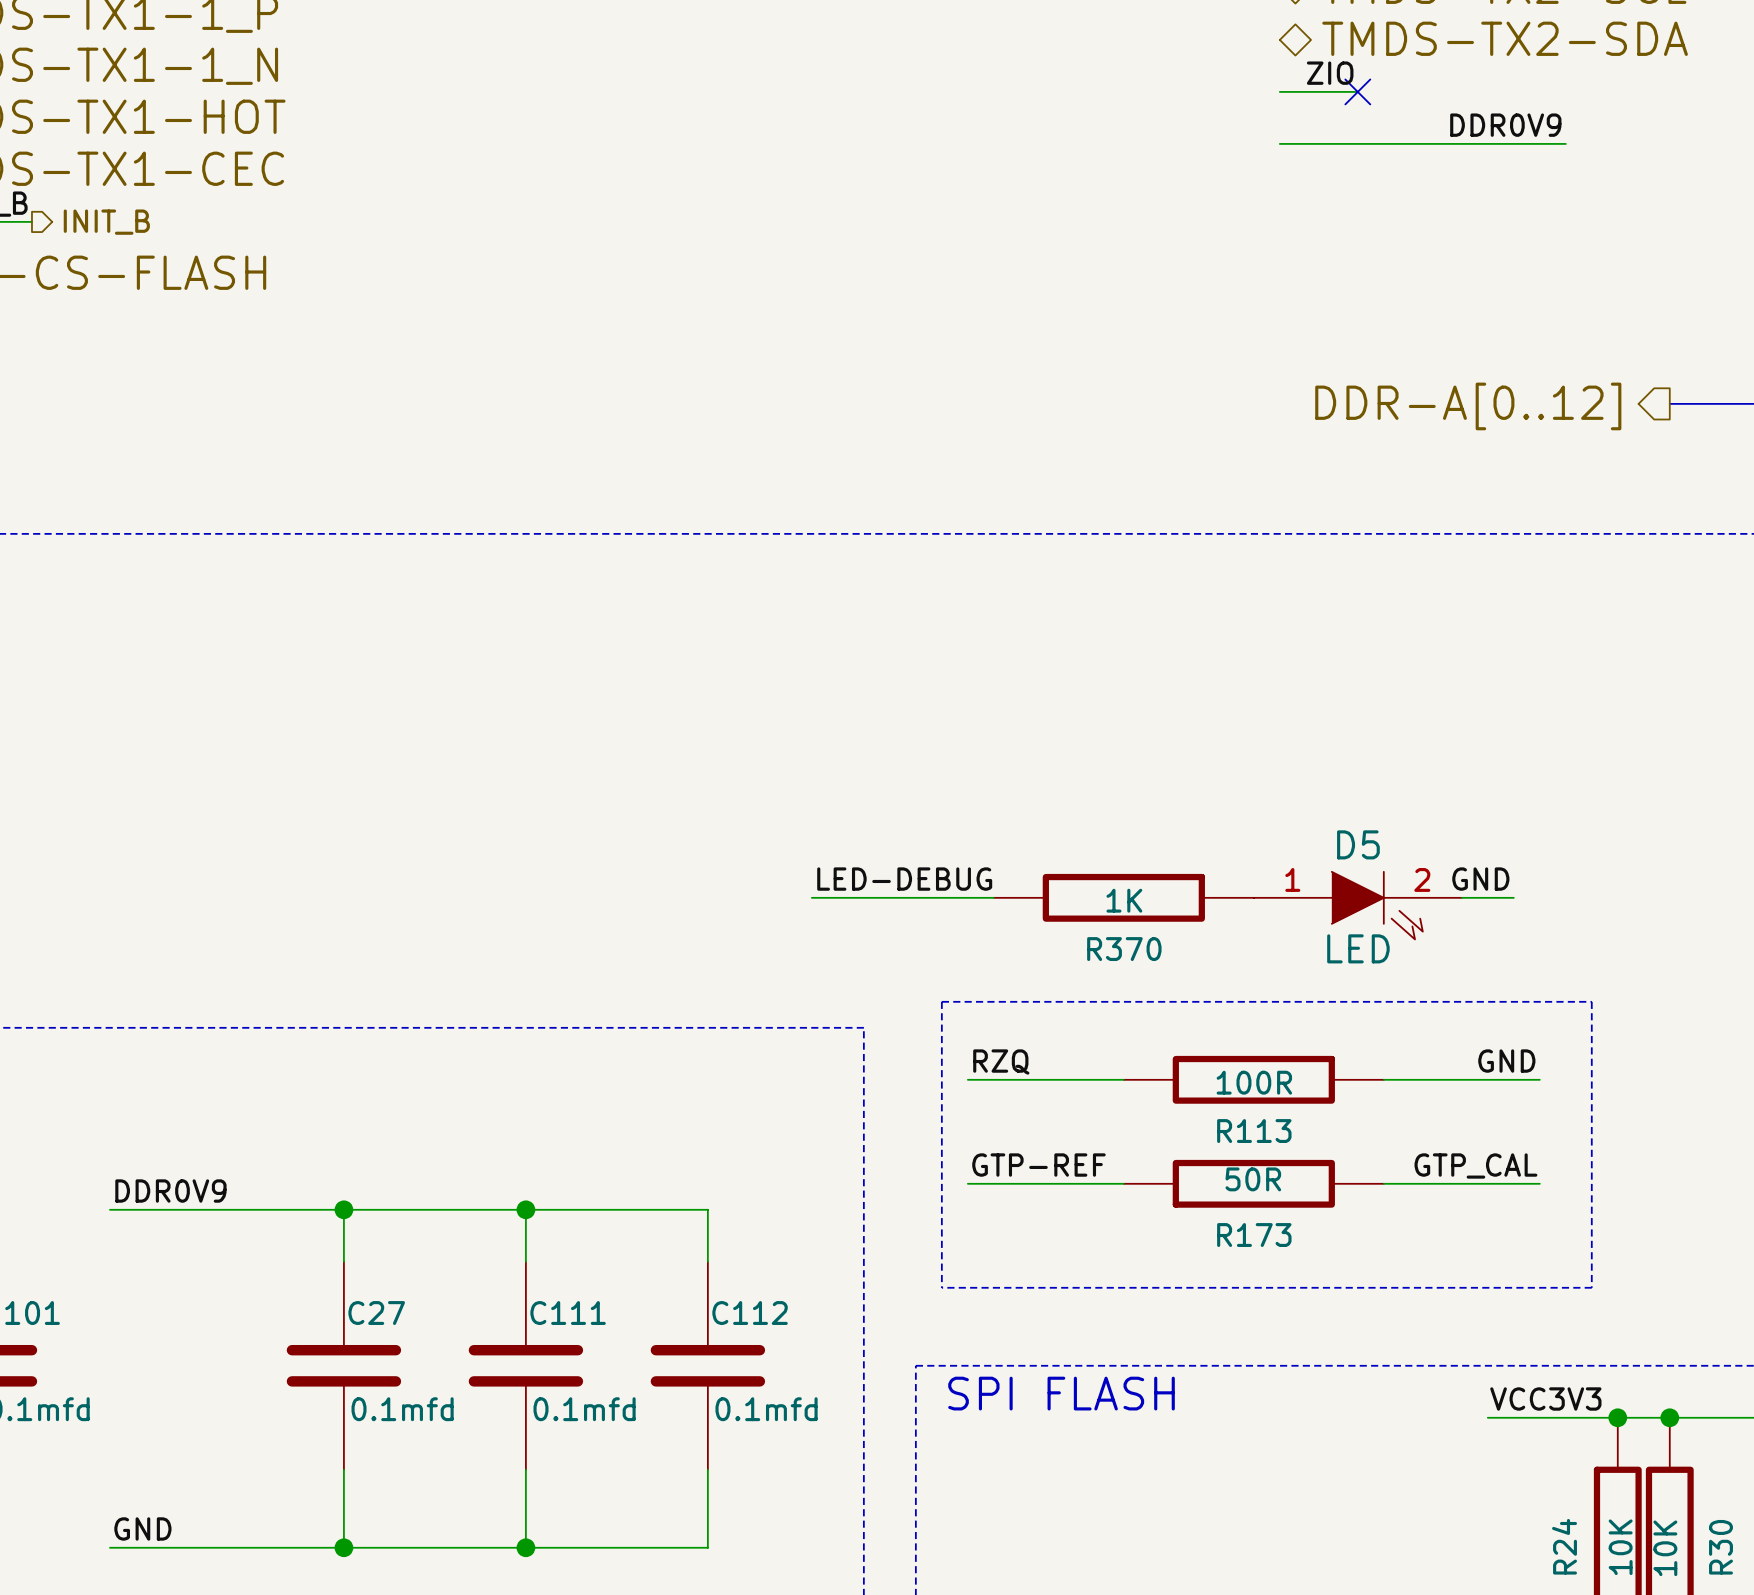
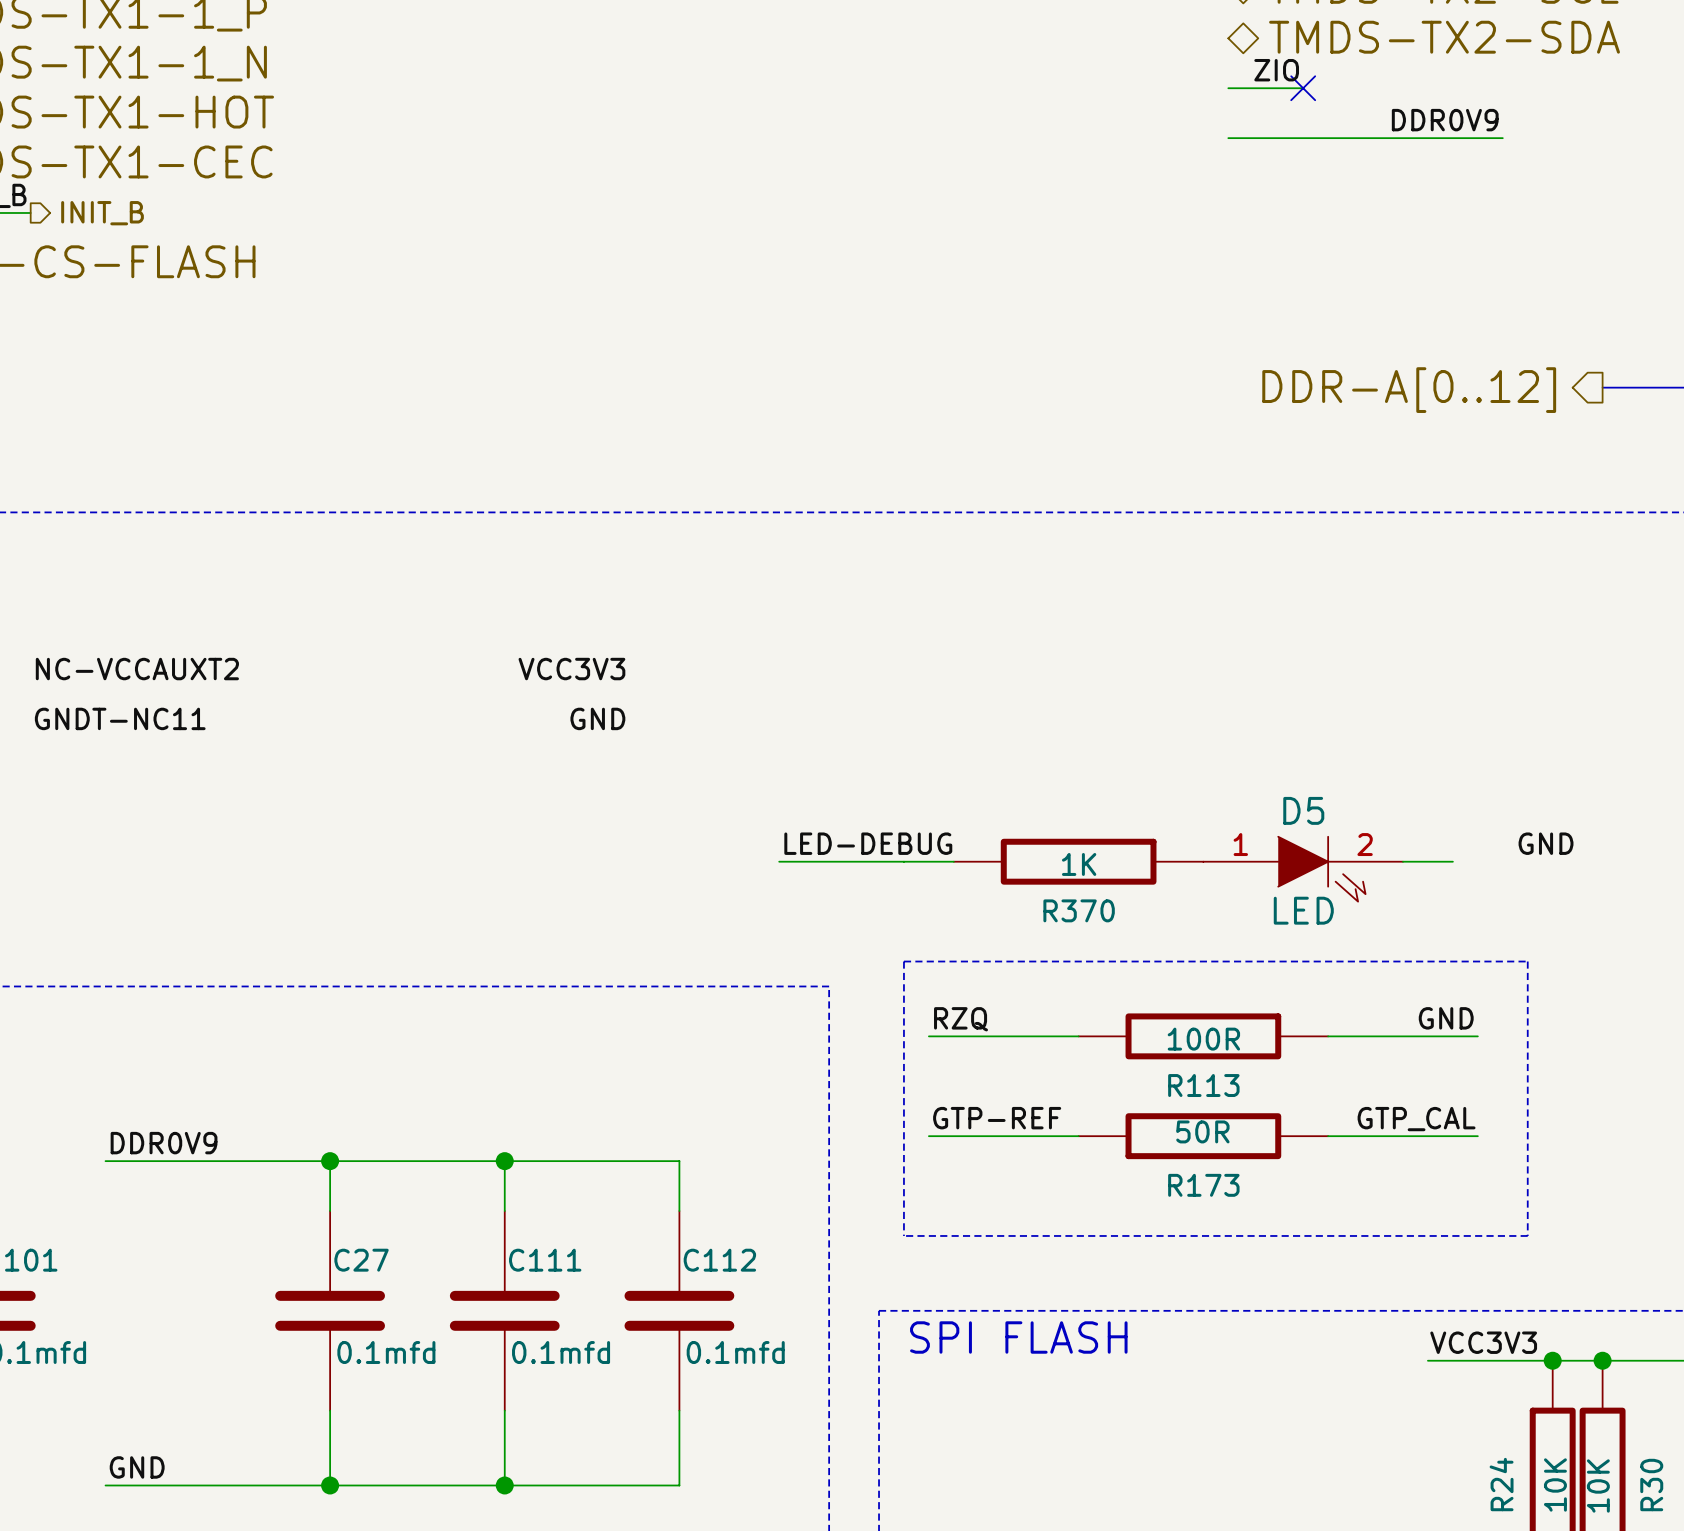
label: none -> NC-VCCAUXT2 (137, 669)
label: none -> VCC3V3 (571, 669)
label: none -> GNDT-NC11 (120, 718)
label: none -> GND (597, 718)
label position: GND (1480, 879) -> GND (1546, 843)

